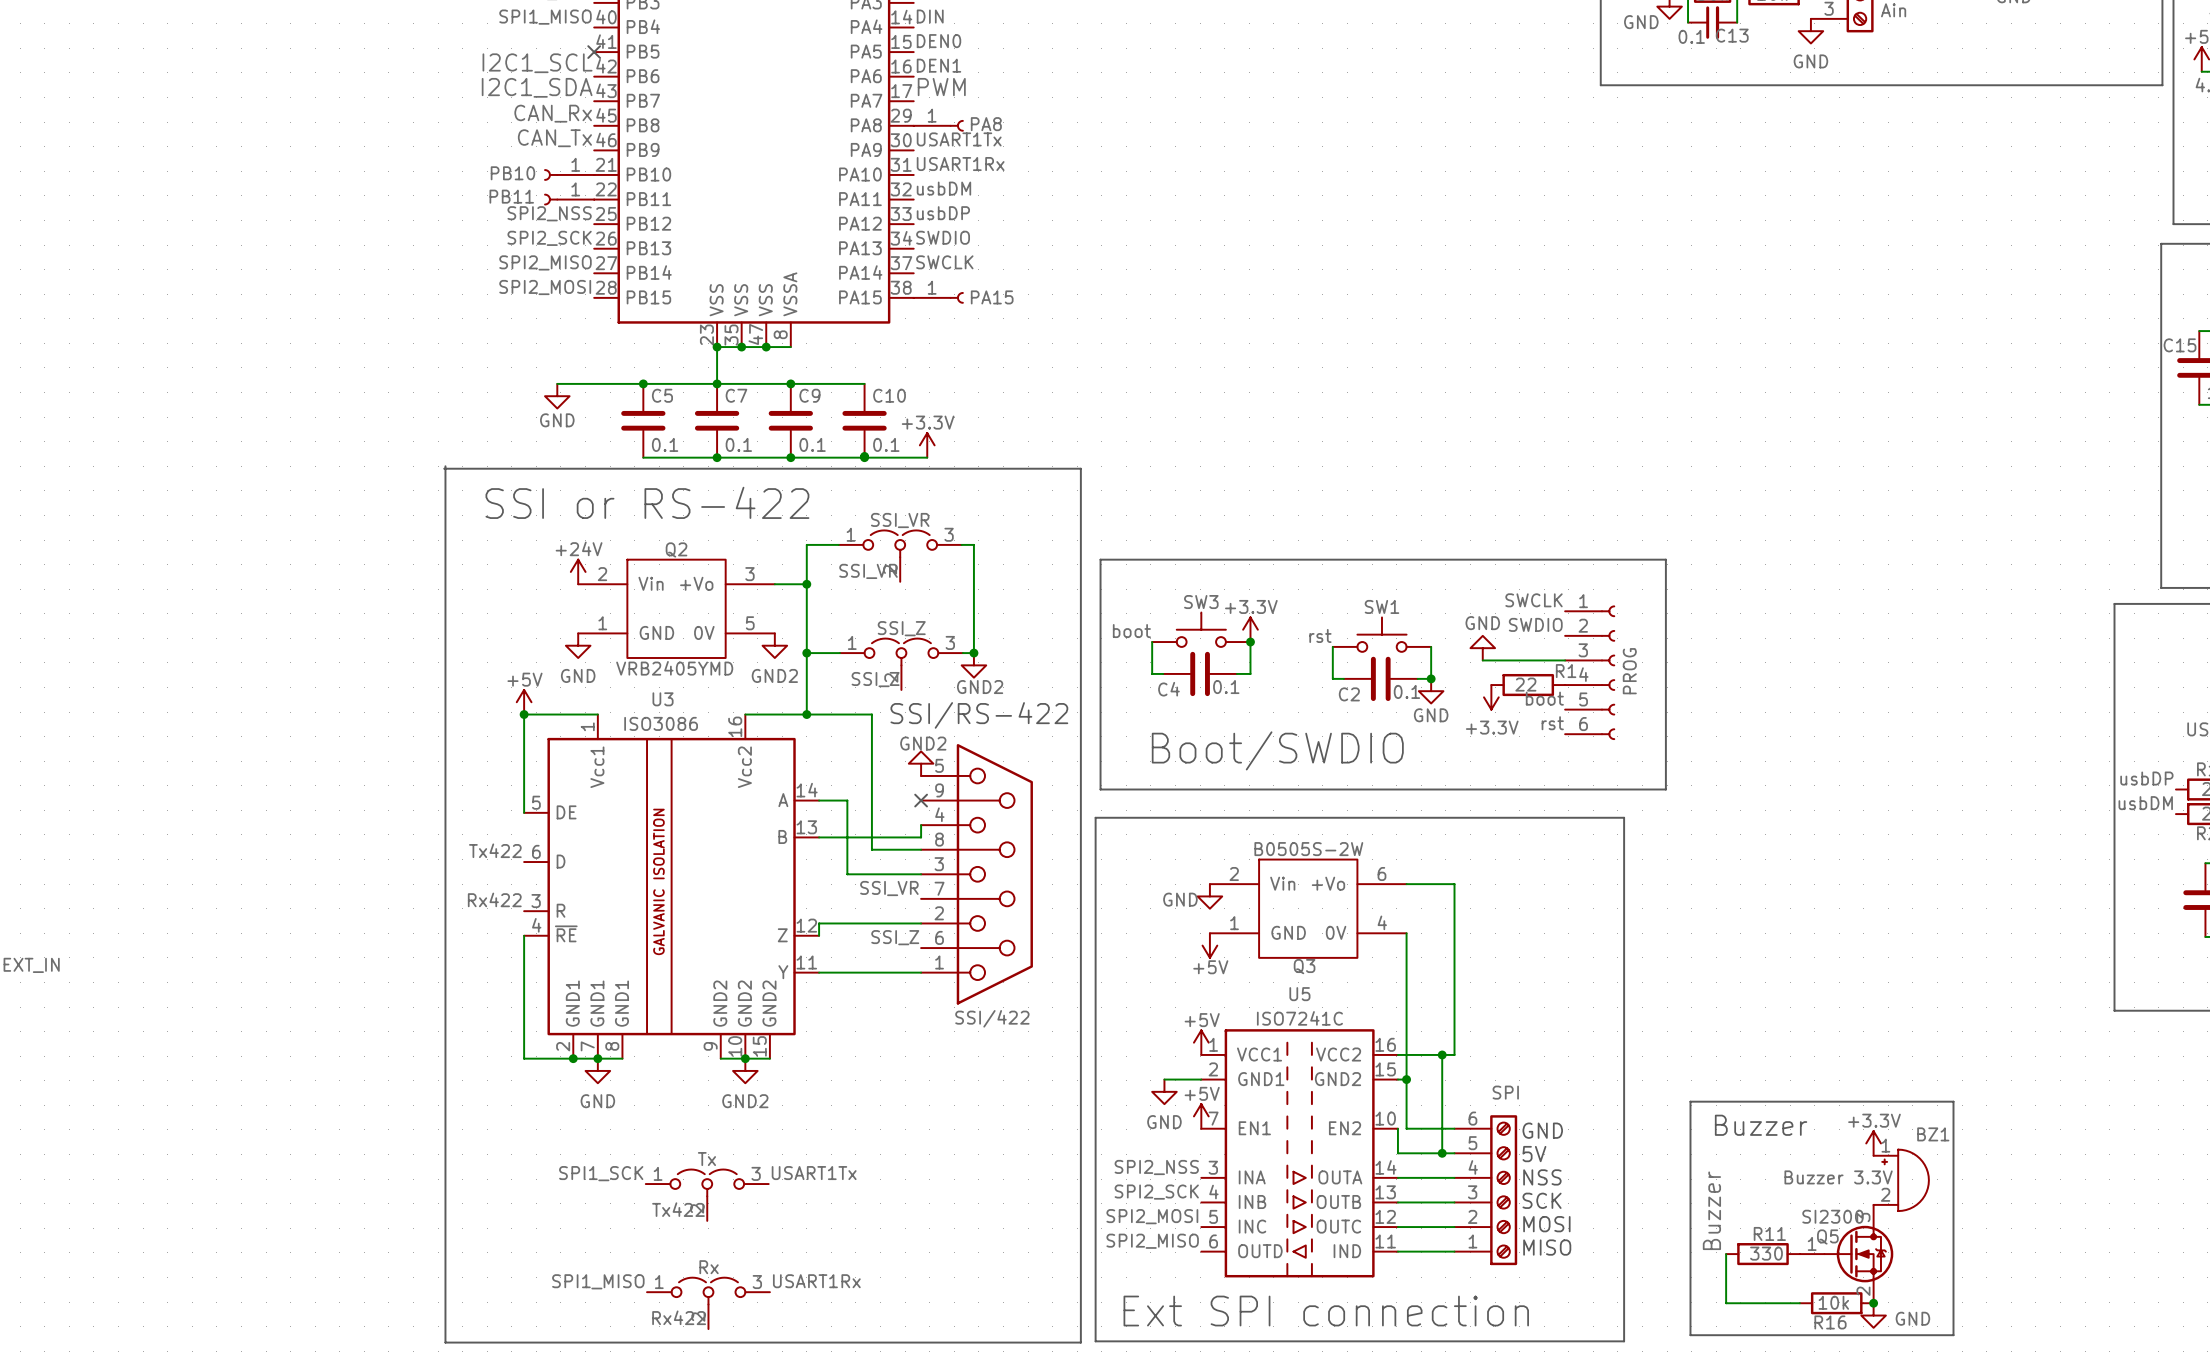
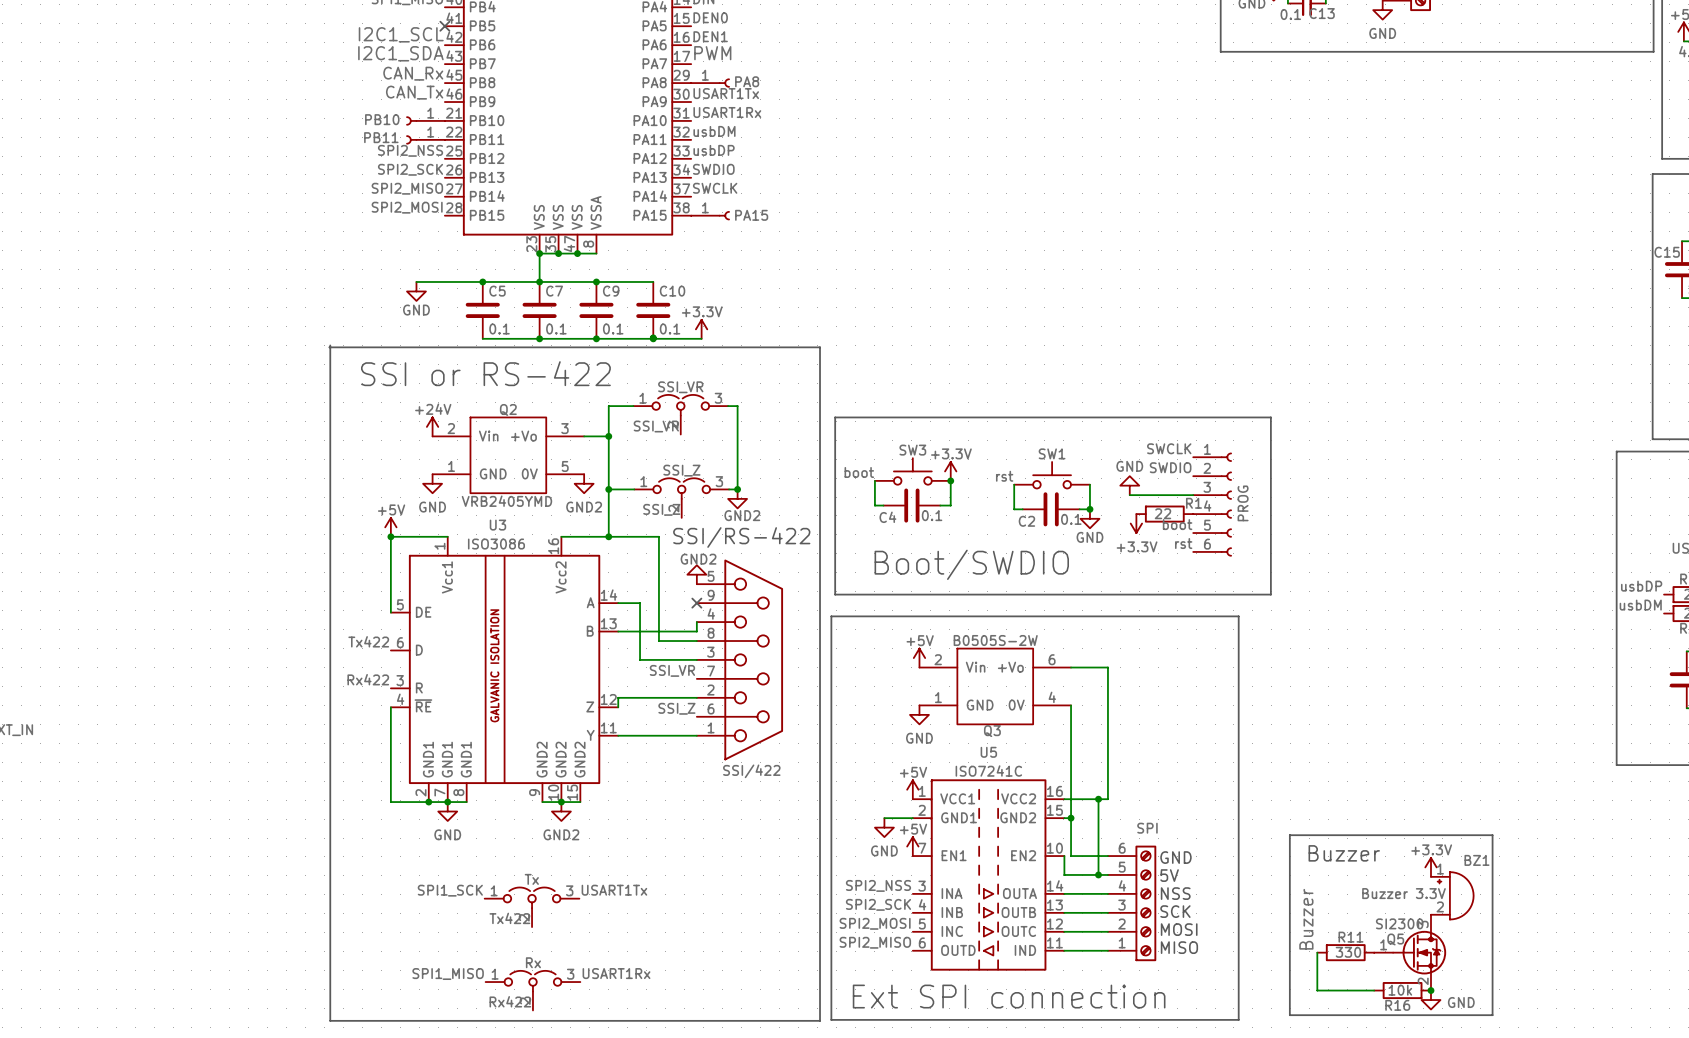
power symbol: none -> +5V (919, 658)
power symbol: GND (1209, 896) -> none
power symbol: +5V (1209, 945) -> GND (919, 714)

